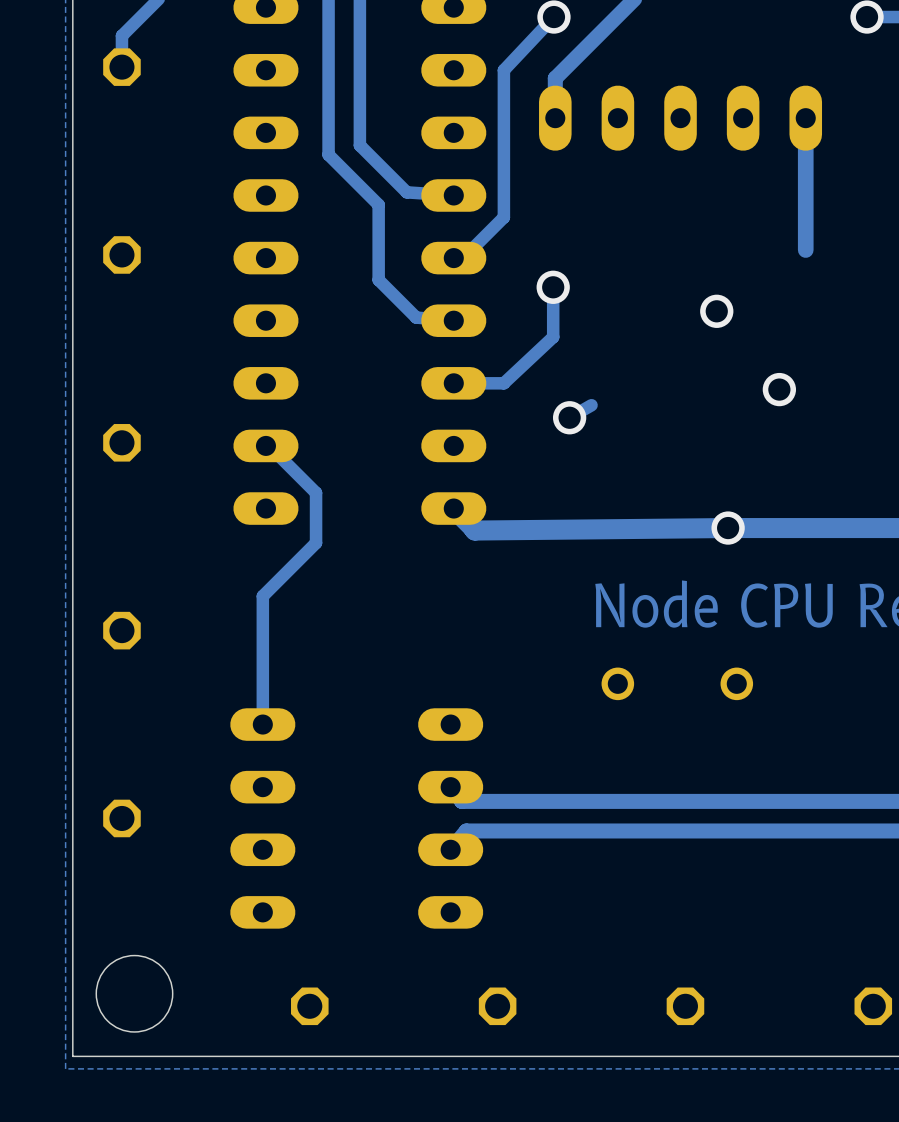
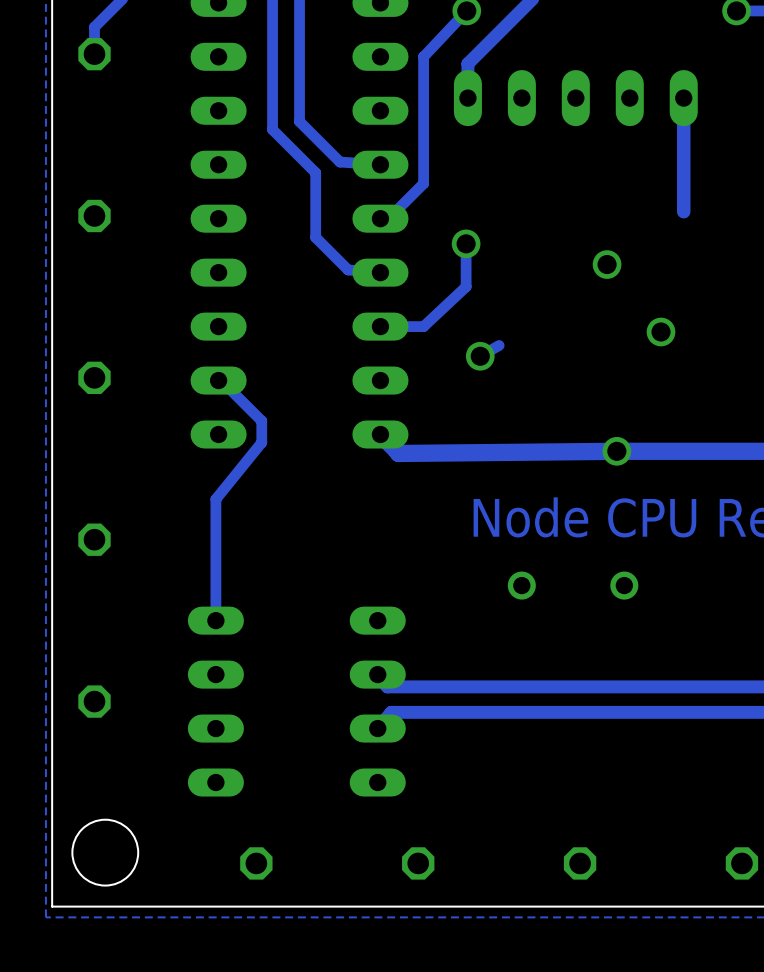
track: (316, 517) (316, 542) (262, 596) -> (261, 442) (215, 499) (215, 510)

